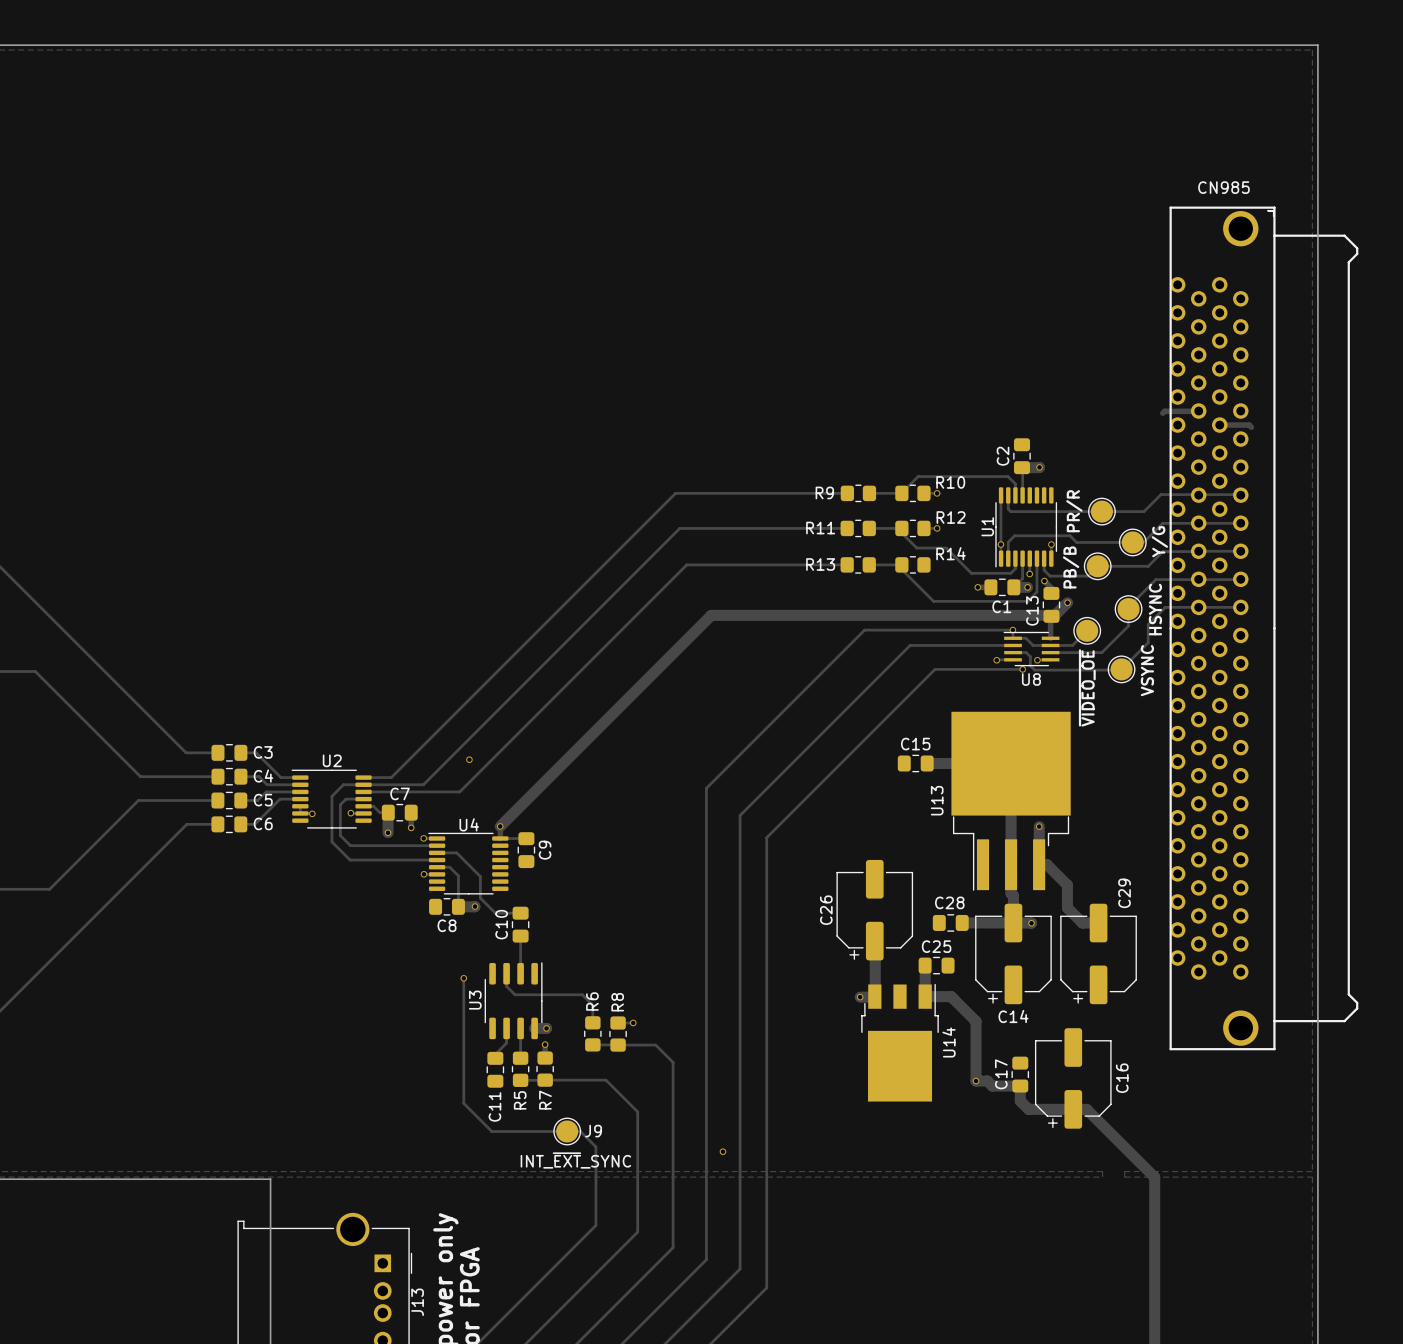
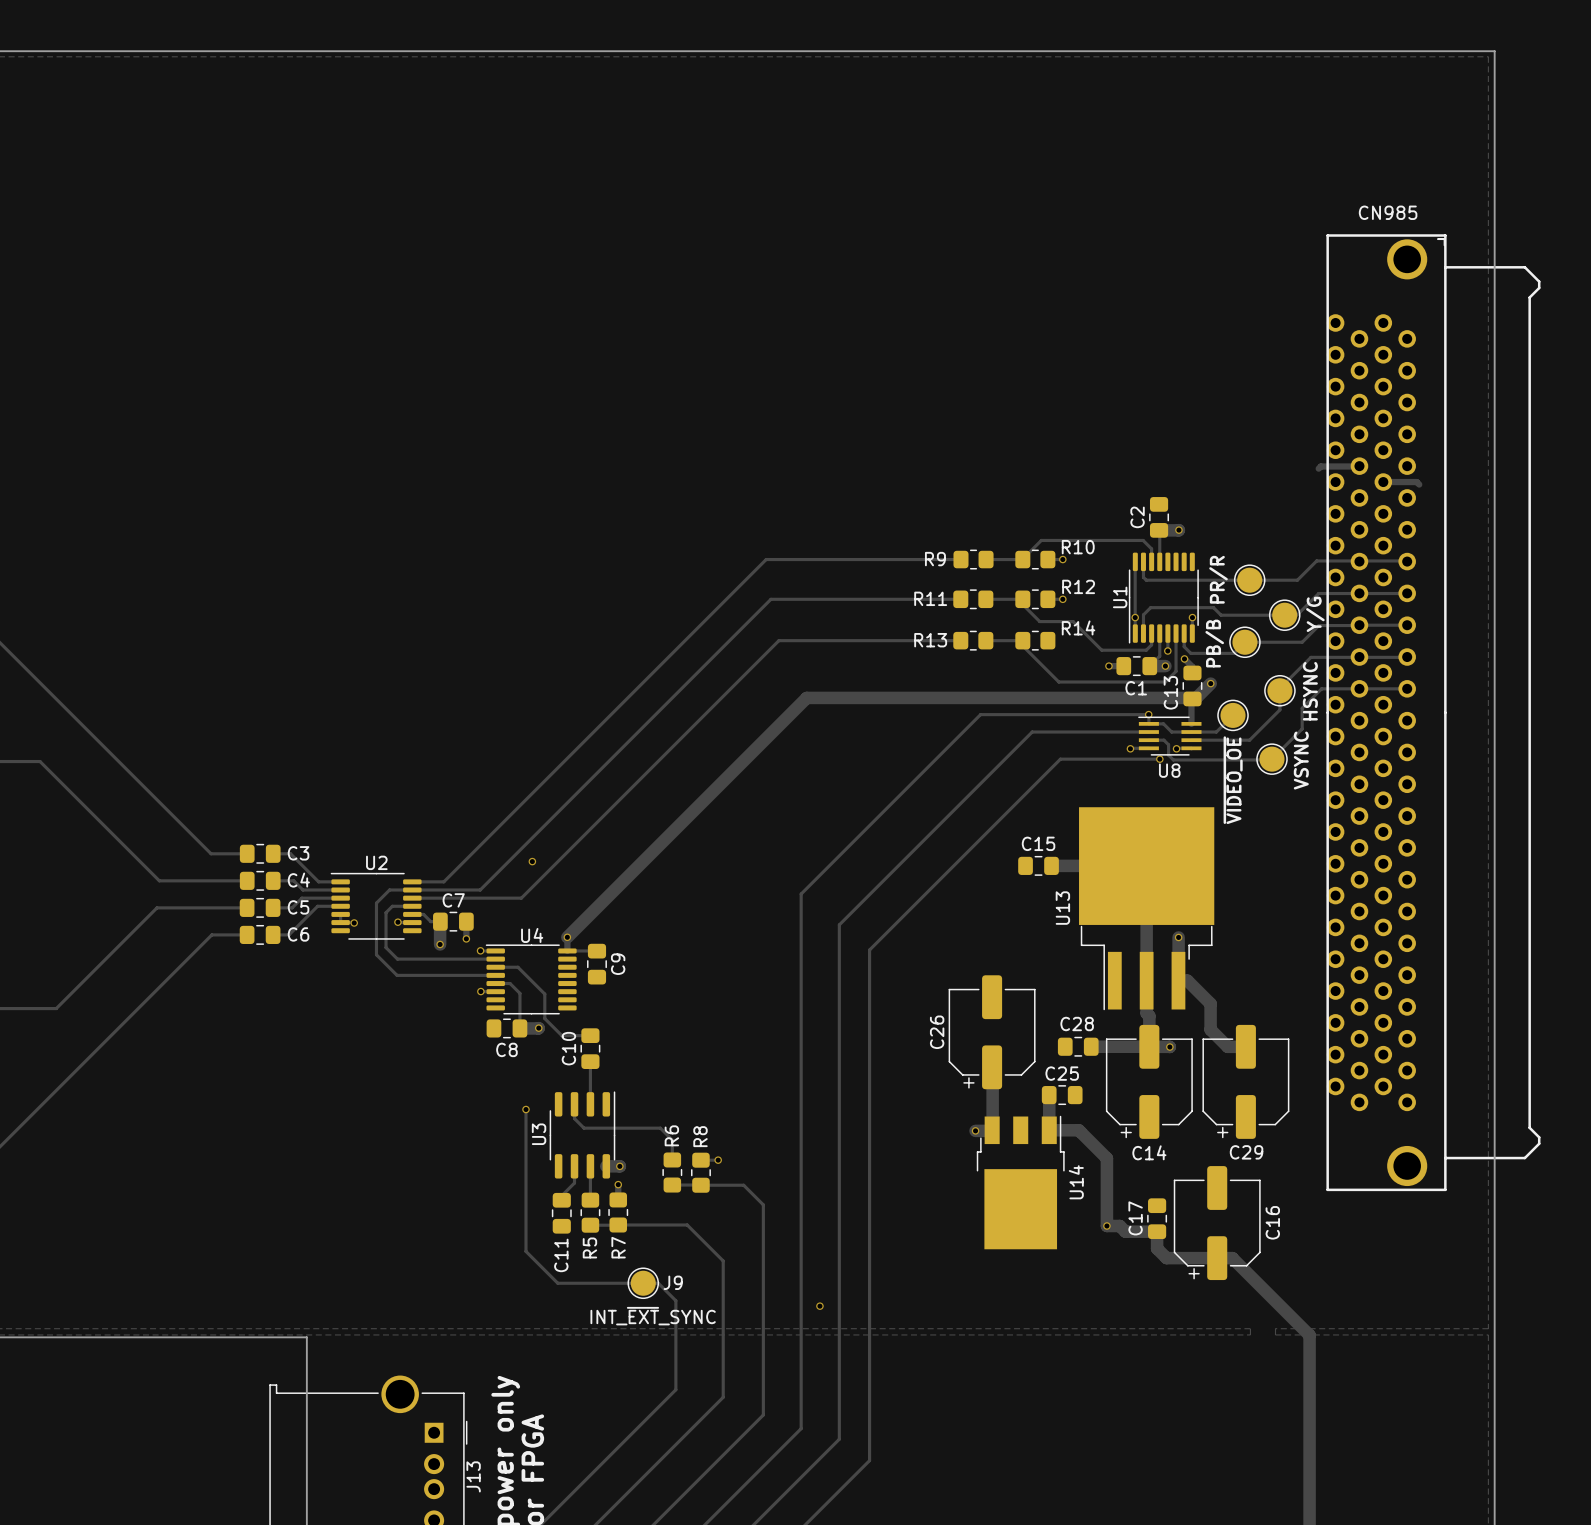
C29 name rotation: 0° (1124, 893) -> 90° clockwise (1246, 1152)
C29 name position: C29 (1124, 893) -> C29 (1246, 1152)

